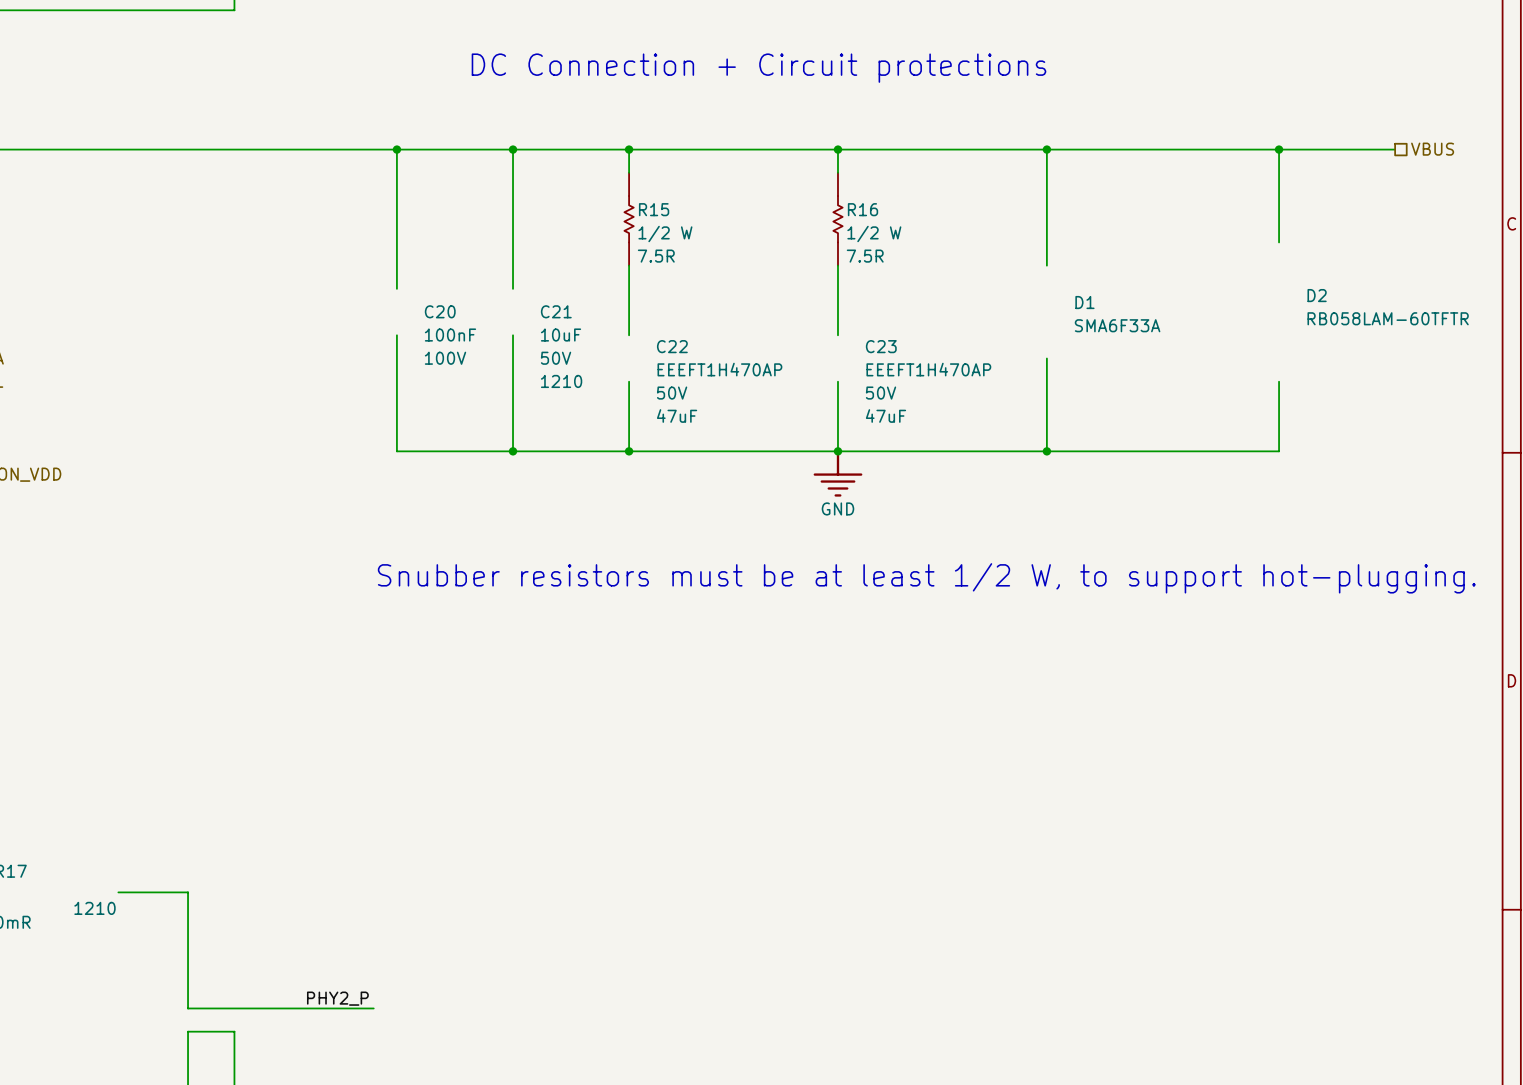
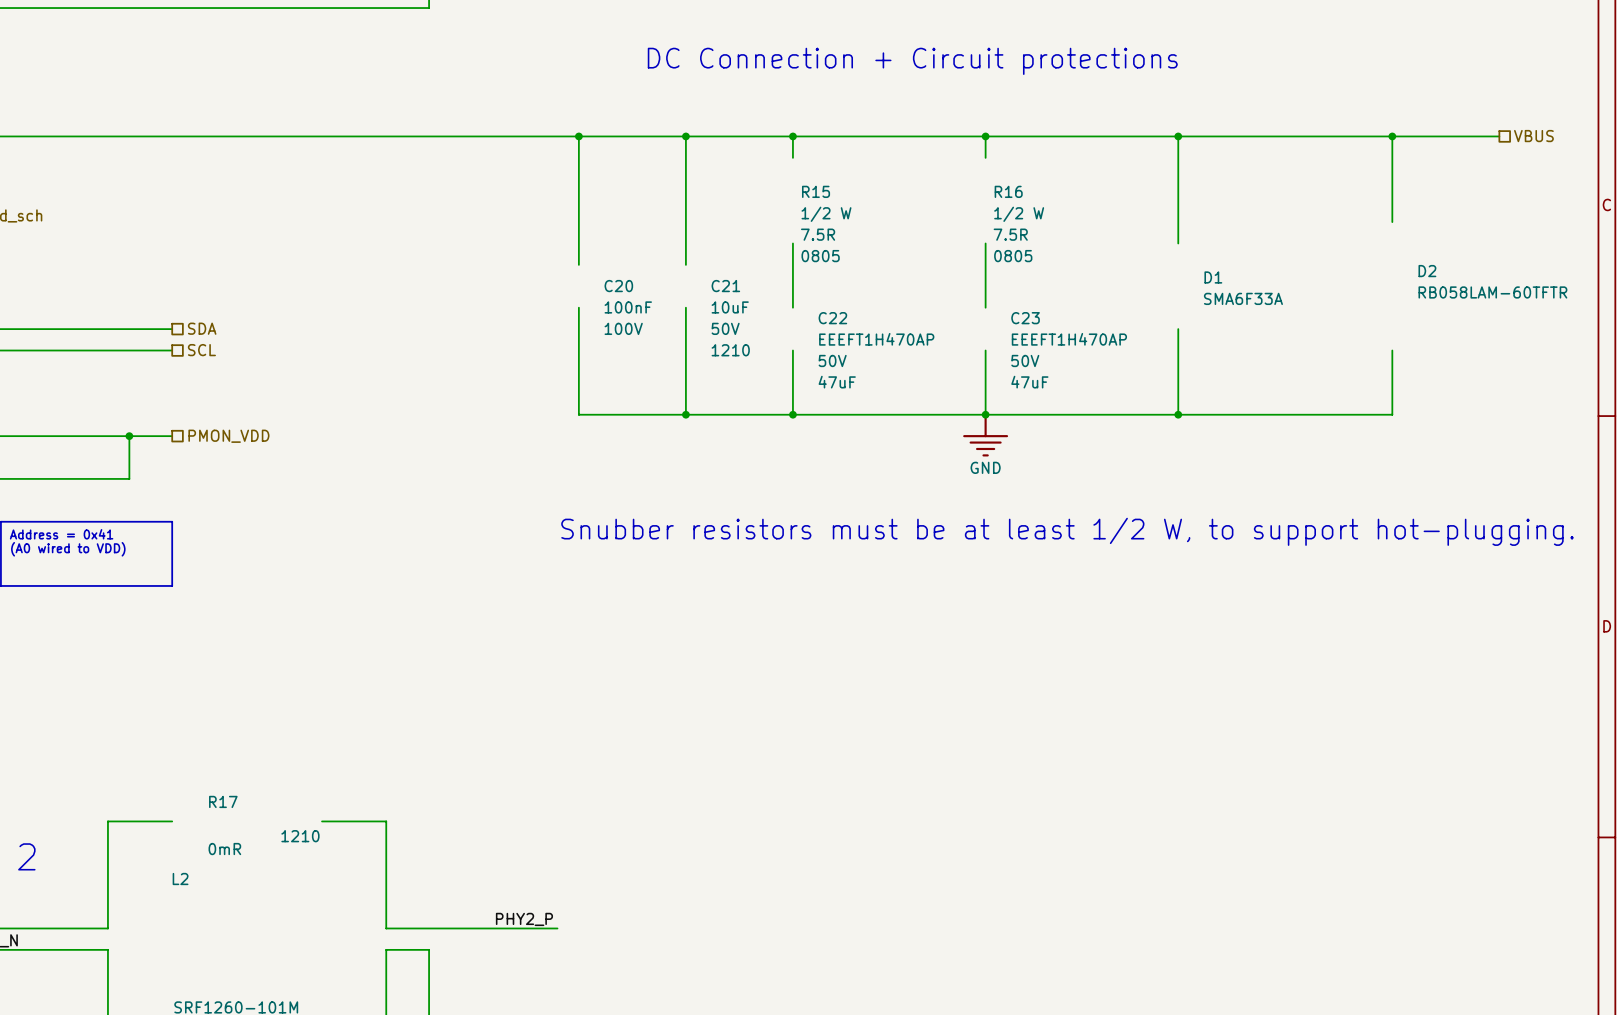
R15 symbol: [624, 172, 634, 266] -> [801, 185, 852, 263]
R16 symbol: [833, 172, 843, 266] -> [993, 185, 1044, 263]
R15 text: none -> 0805 (820, 256)
R16 text: none -> 0805 (1013, 256)

